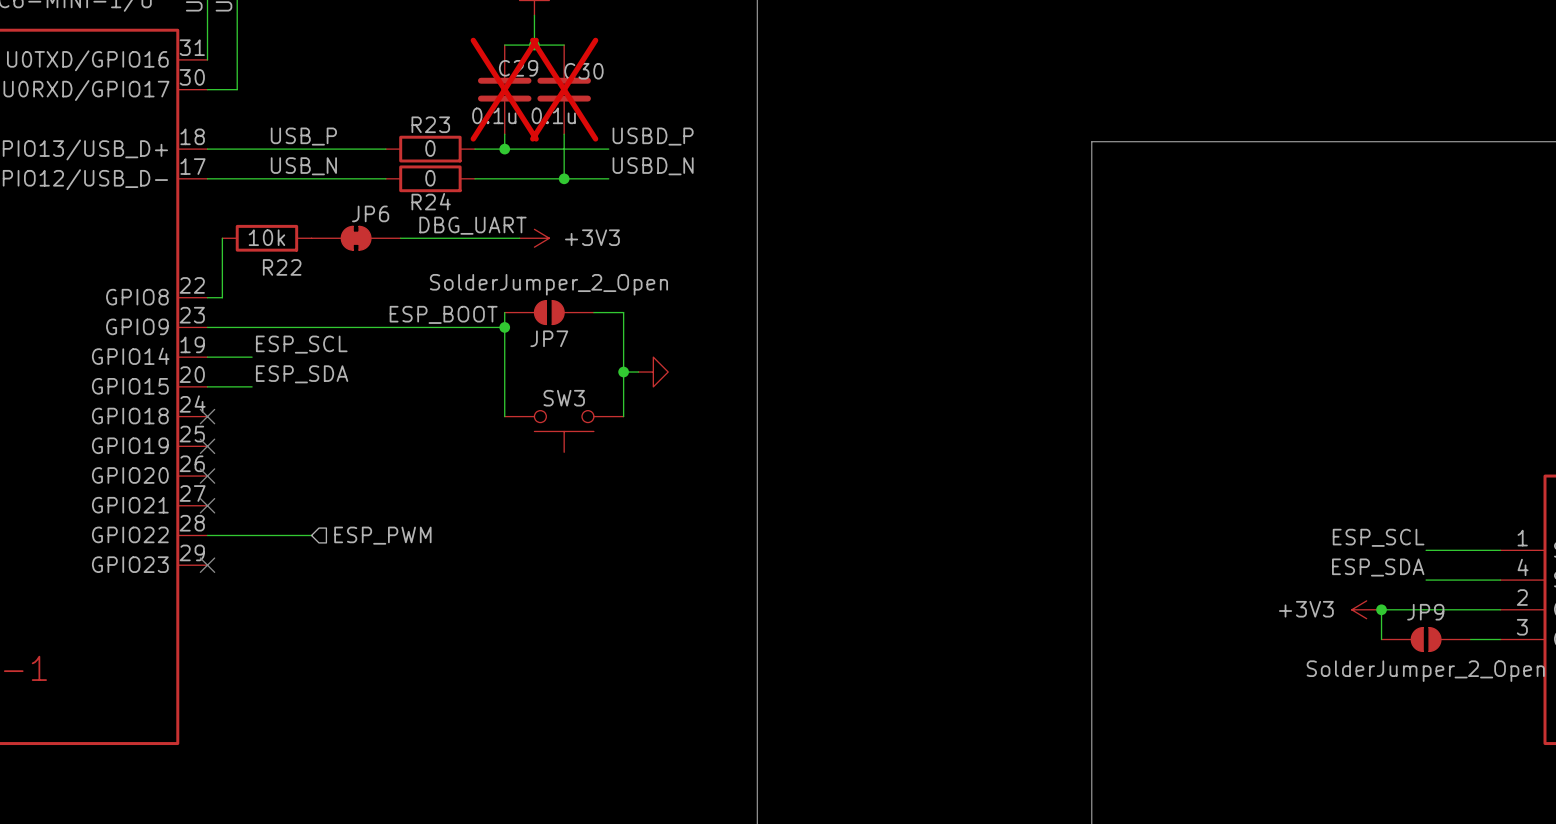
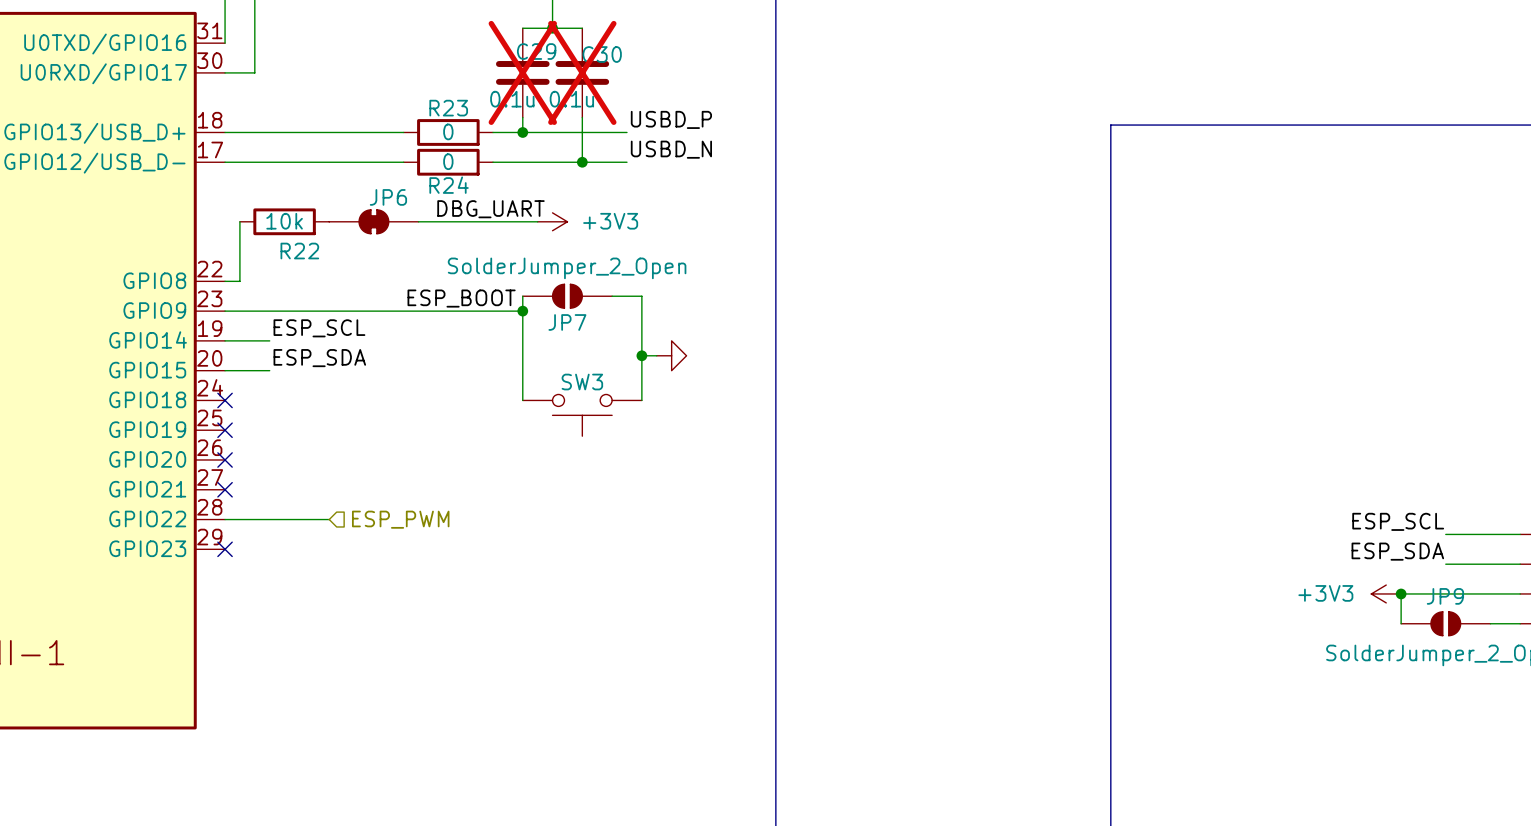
label: USB_P (303, 136) -> none
label: USB_N (303, 166) -> none

